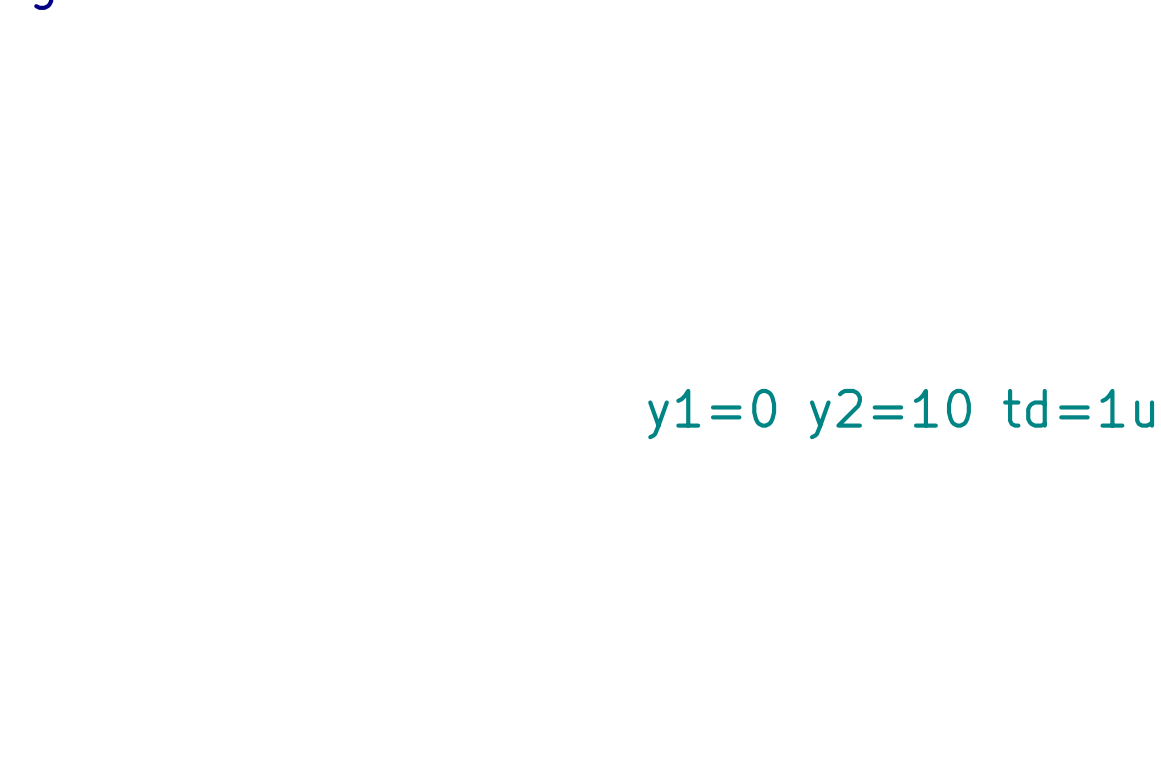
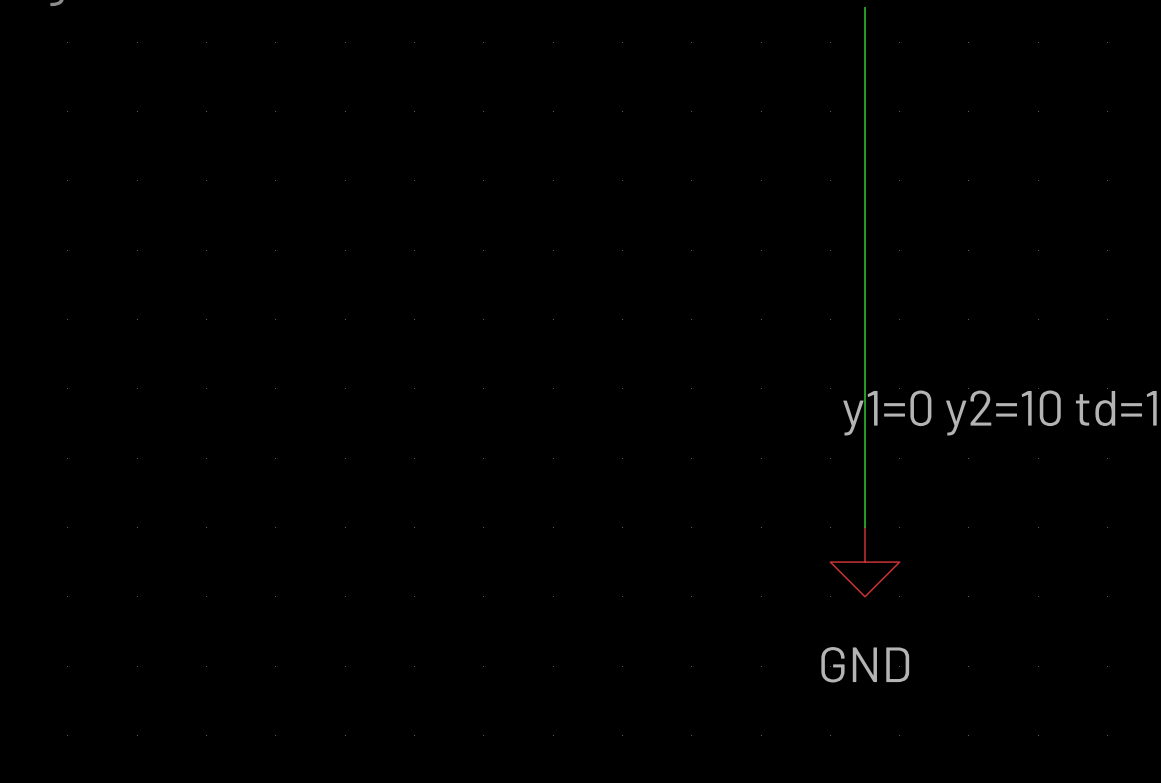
wire: none -> (865, 7) (865, 527)
power symbol: none -> GND (865, 562)

